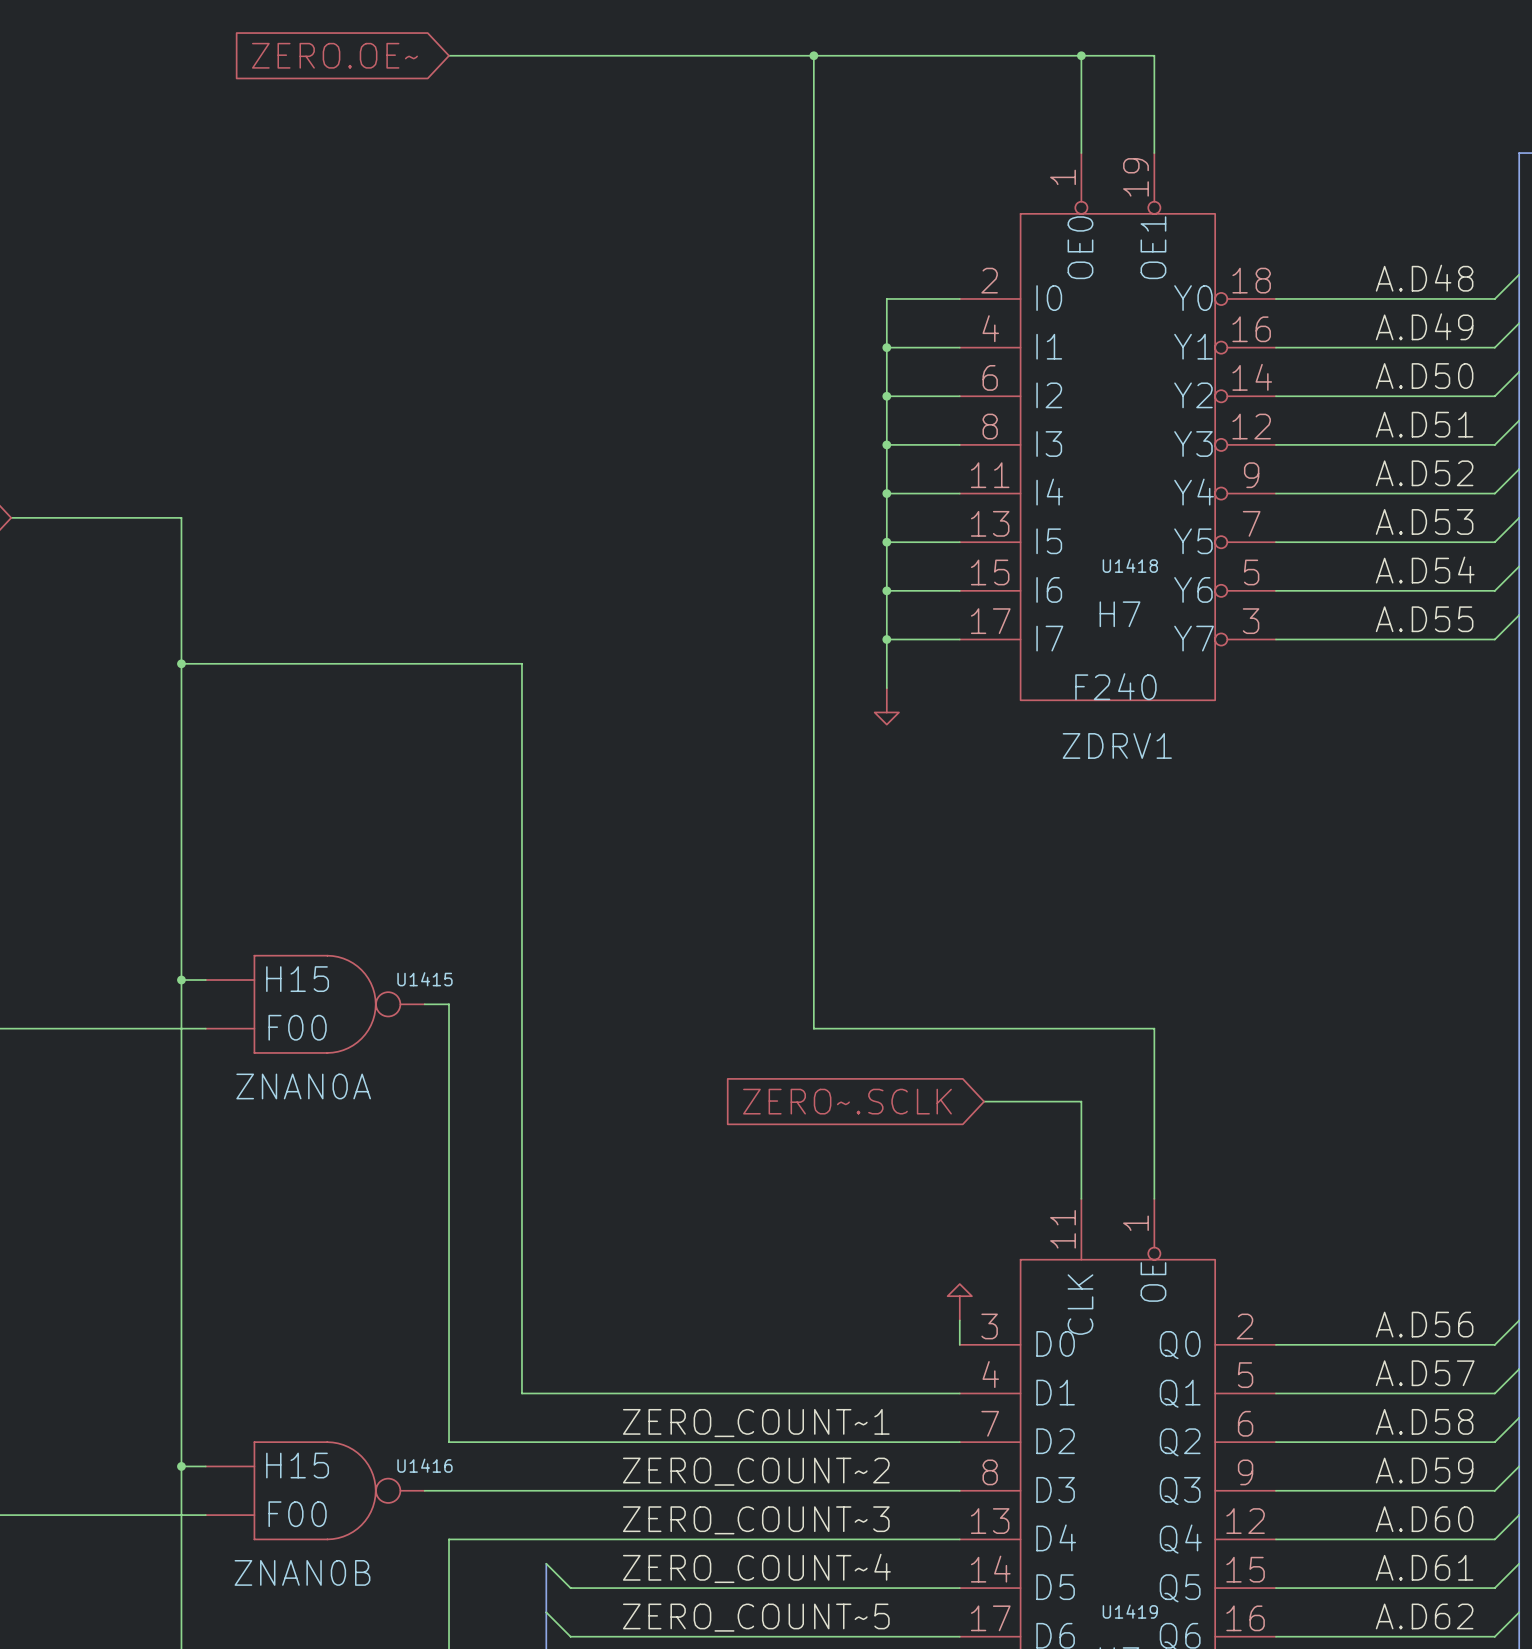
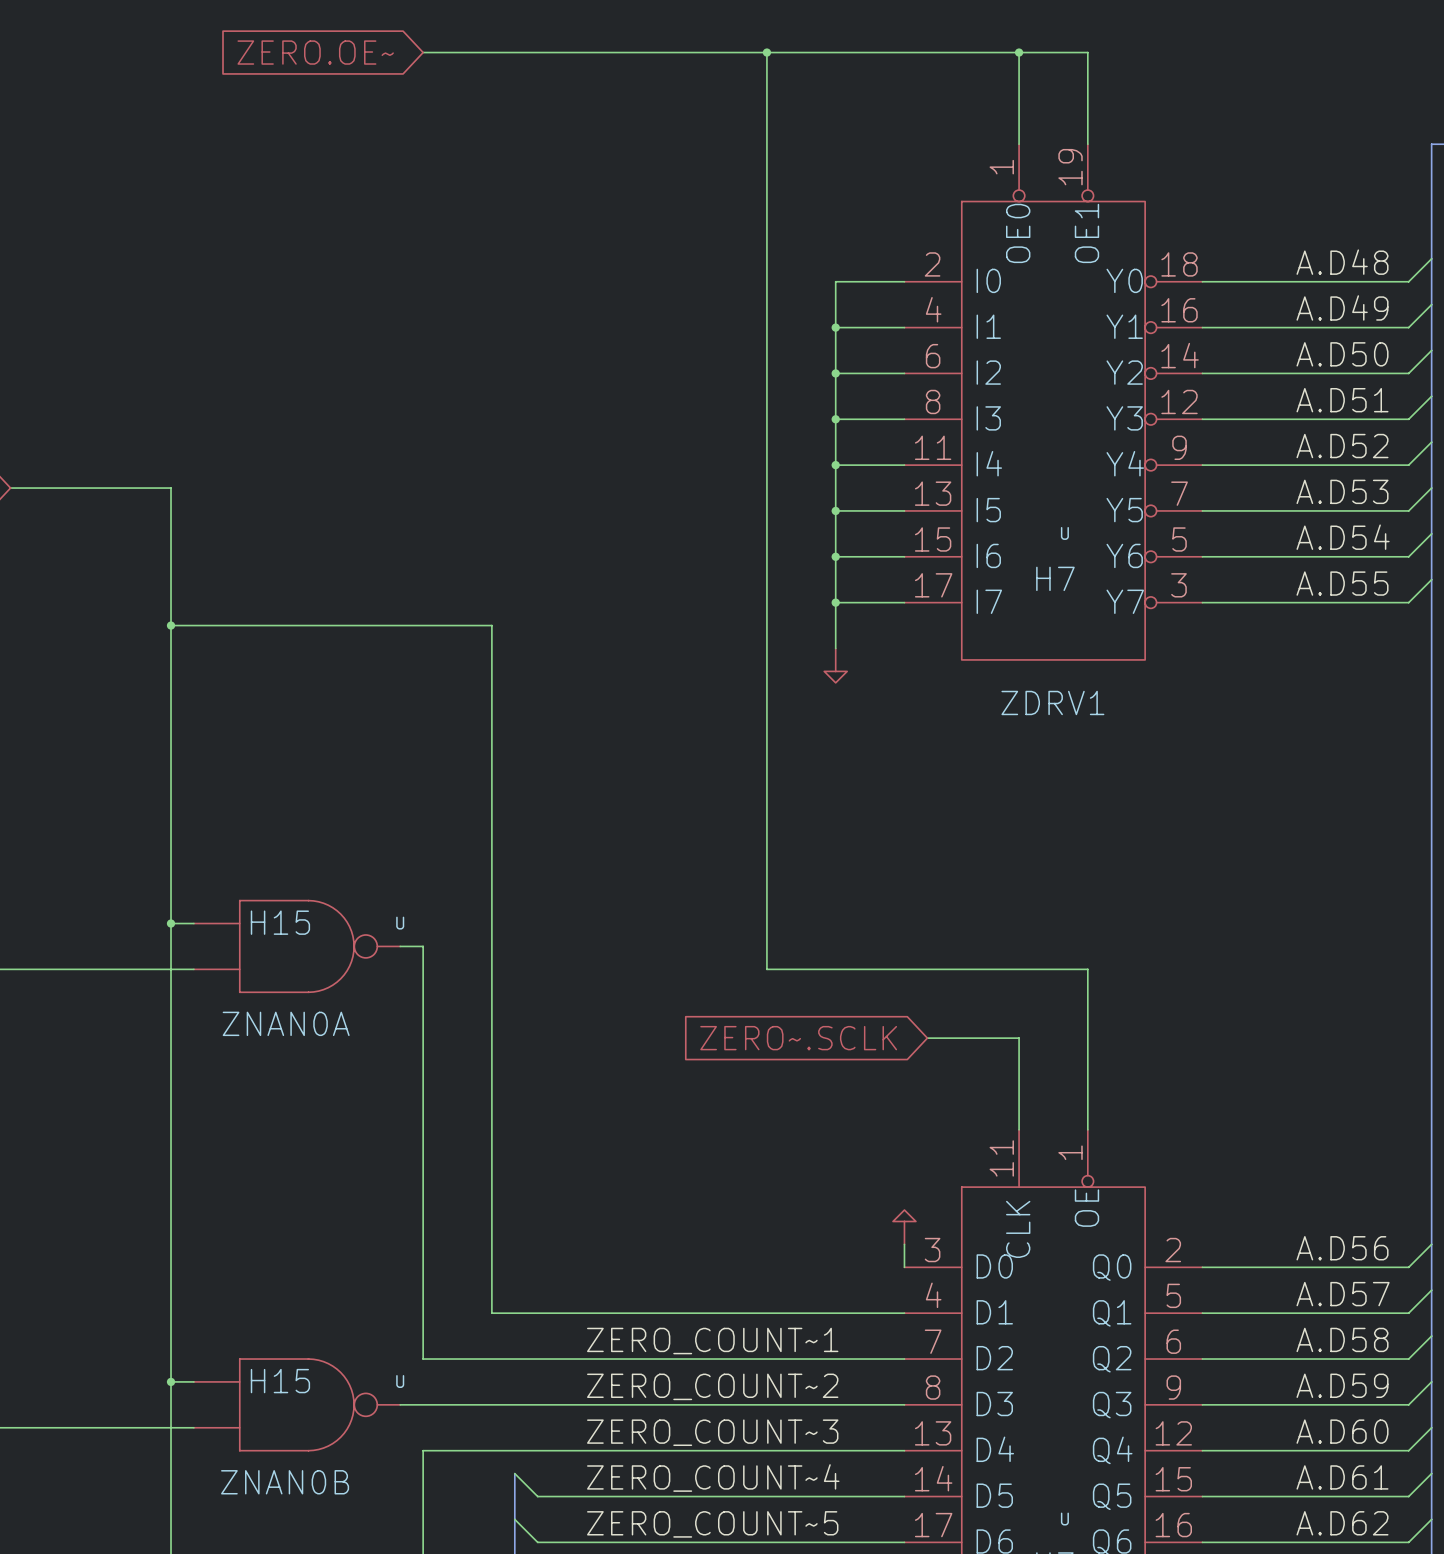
U1418 name: U1418 (1130, 565) -> U (1064, 533)
U1418 value: F240 (1115, 686) -> none
U1415 name: U1415 (424, 979) -> U (400, 923)
U1415 value: F00 (297, 1027) -> none
U1416 name: U1416 (424, 1465) -> U (400, 1381)
U1416 value: F00 (297, 1514) -> none
U1419 name: U1419 (1130, 1611) -> U (1064, 1519)

